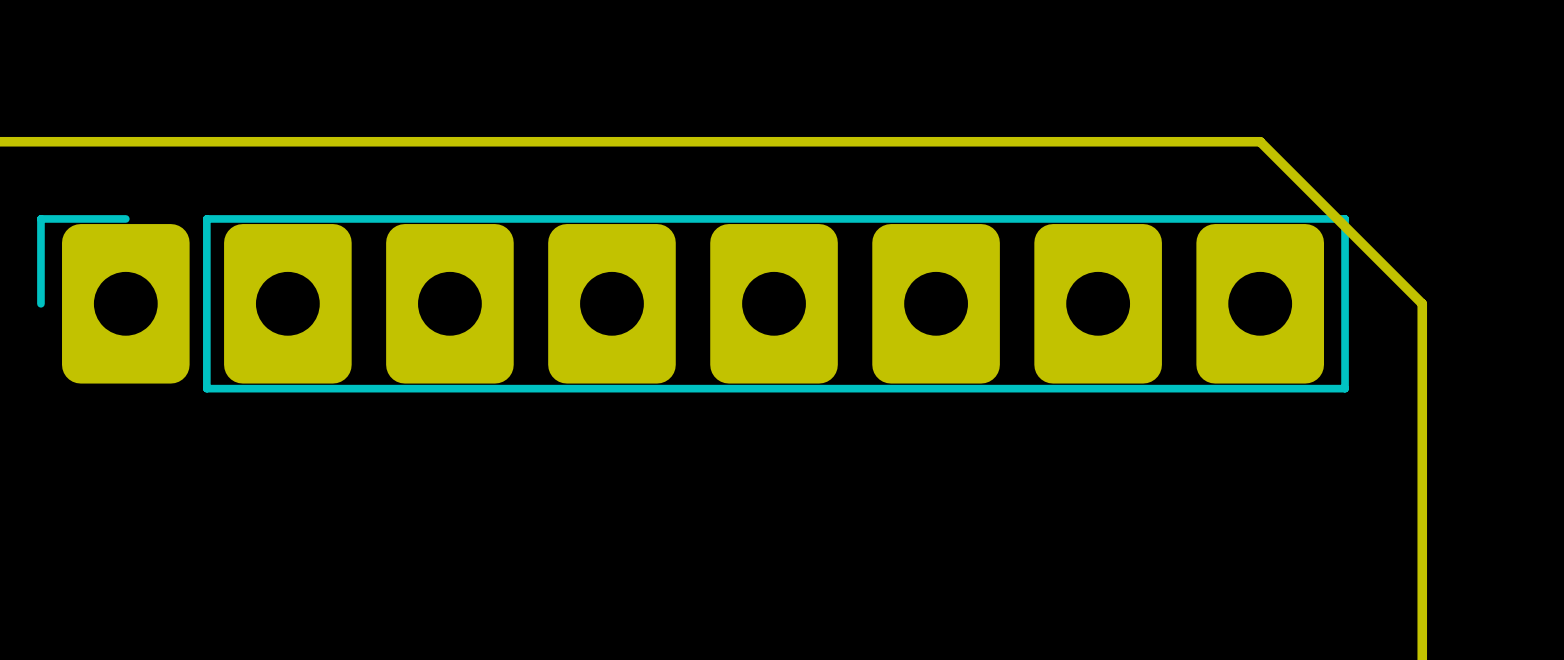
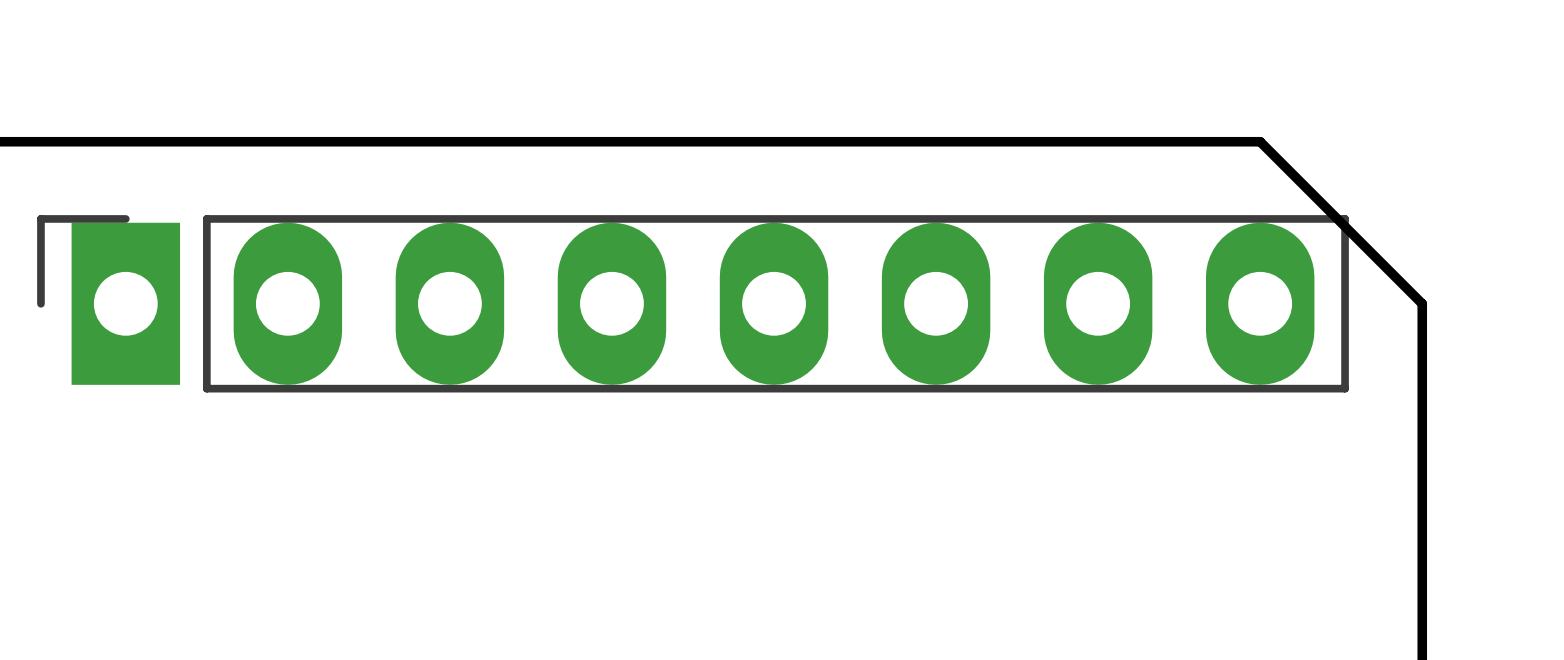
part footprint: [37, 215, 1349, 393] -> [37, 215, 1349, 393]

